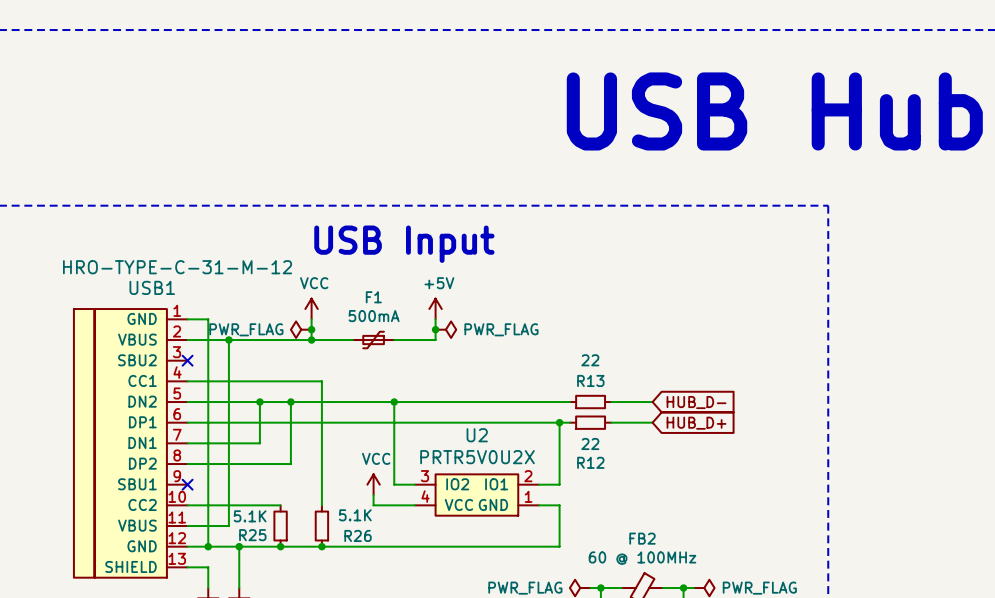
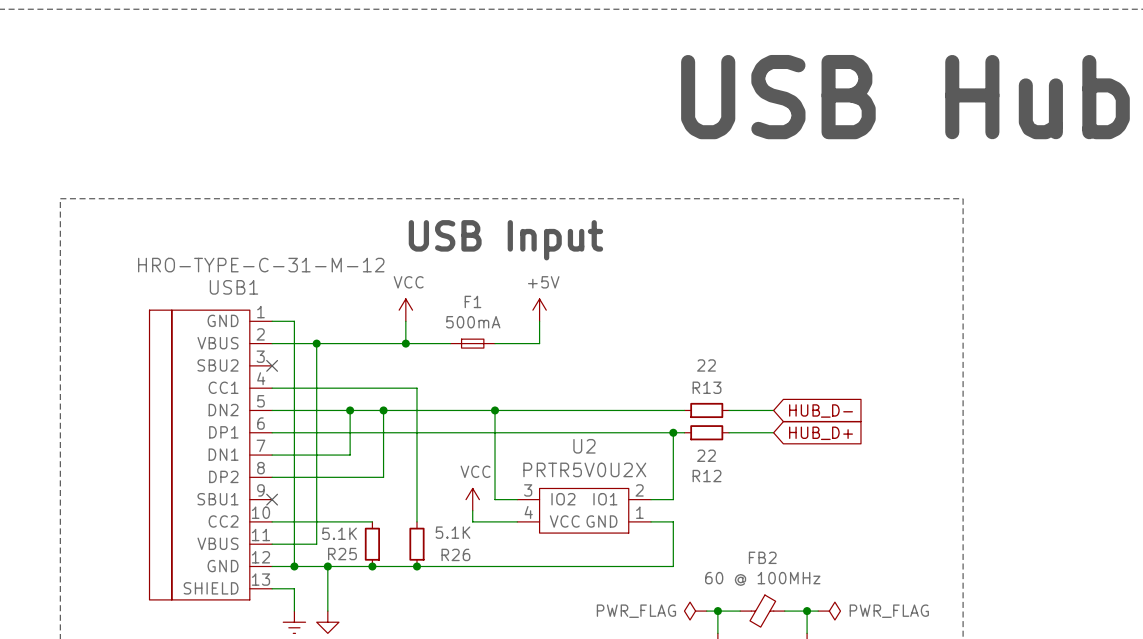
power symbol: PWR_FLAG (301, 329) -> none
junction: (311, 329) -> none
junction: (435, 329) -> none
power symbol: PWR_FLAG (445, 329) -> none
F1 symbol: [352, 331, 395, 349] -> [450, 339, 496, 349]

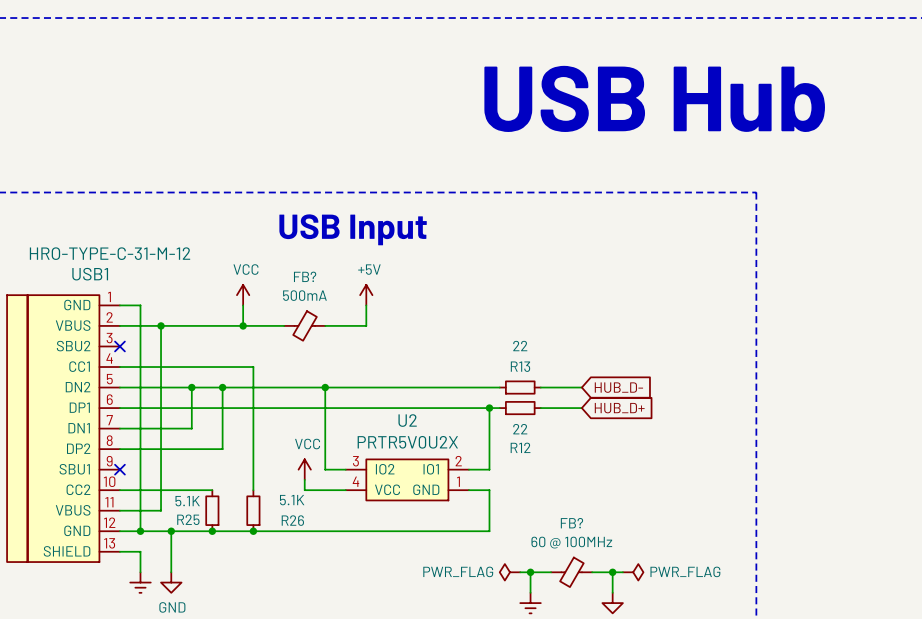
F1: 500mA (472, 343) -> none
FB?: none -> 500mA (304, 325)
FB2 name: FB2 (762, 557) -> FB? (571, 523)

